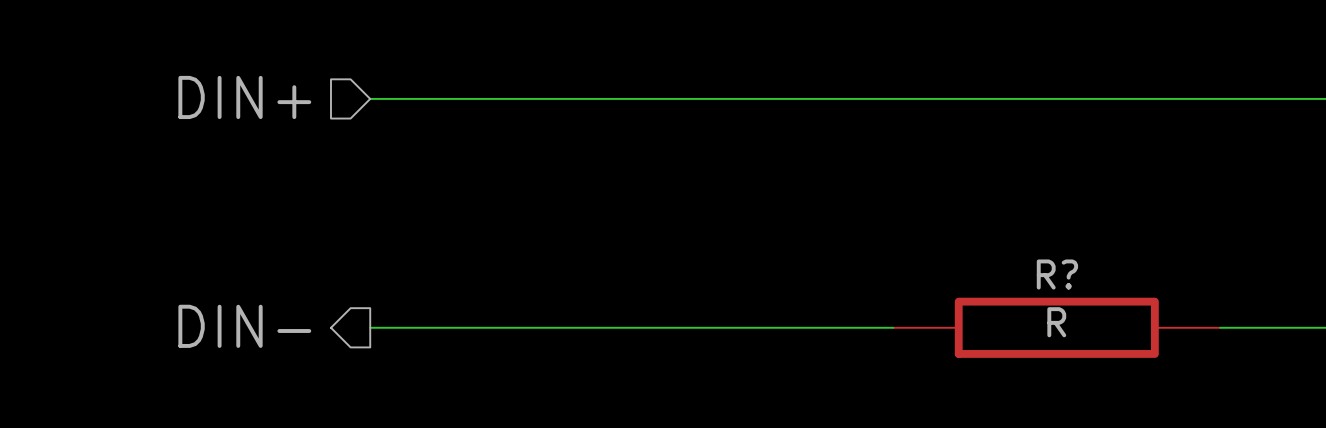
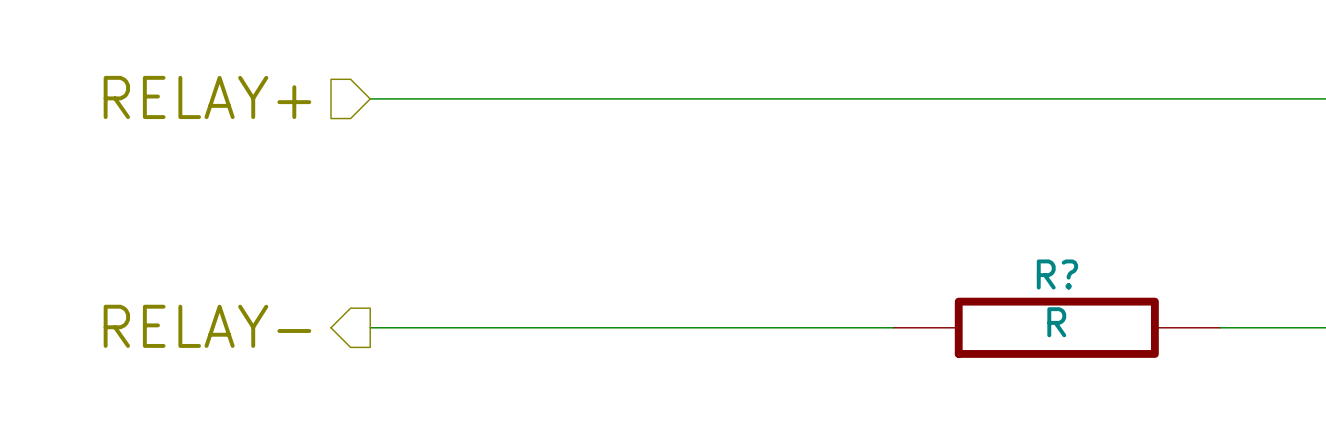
hierarchical label: DIN+ (244, 97) -> RELAY+ (207, 97)
hierarchical label: DIN- (244, 326) -> RELAY- (207, 326)

